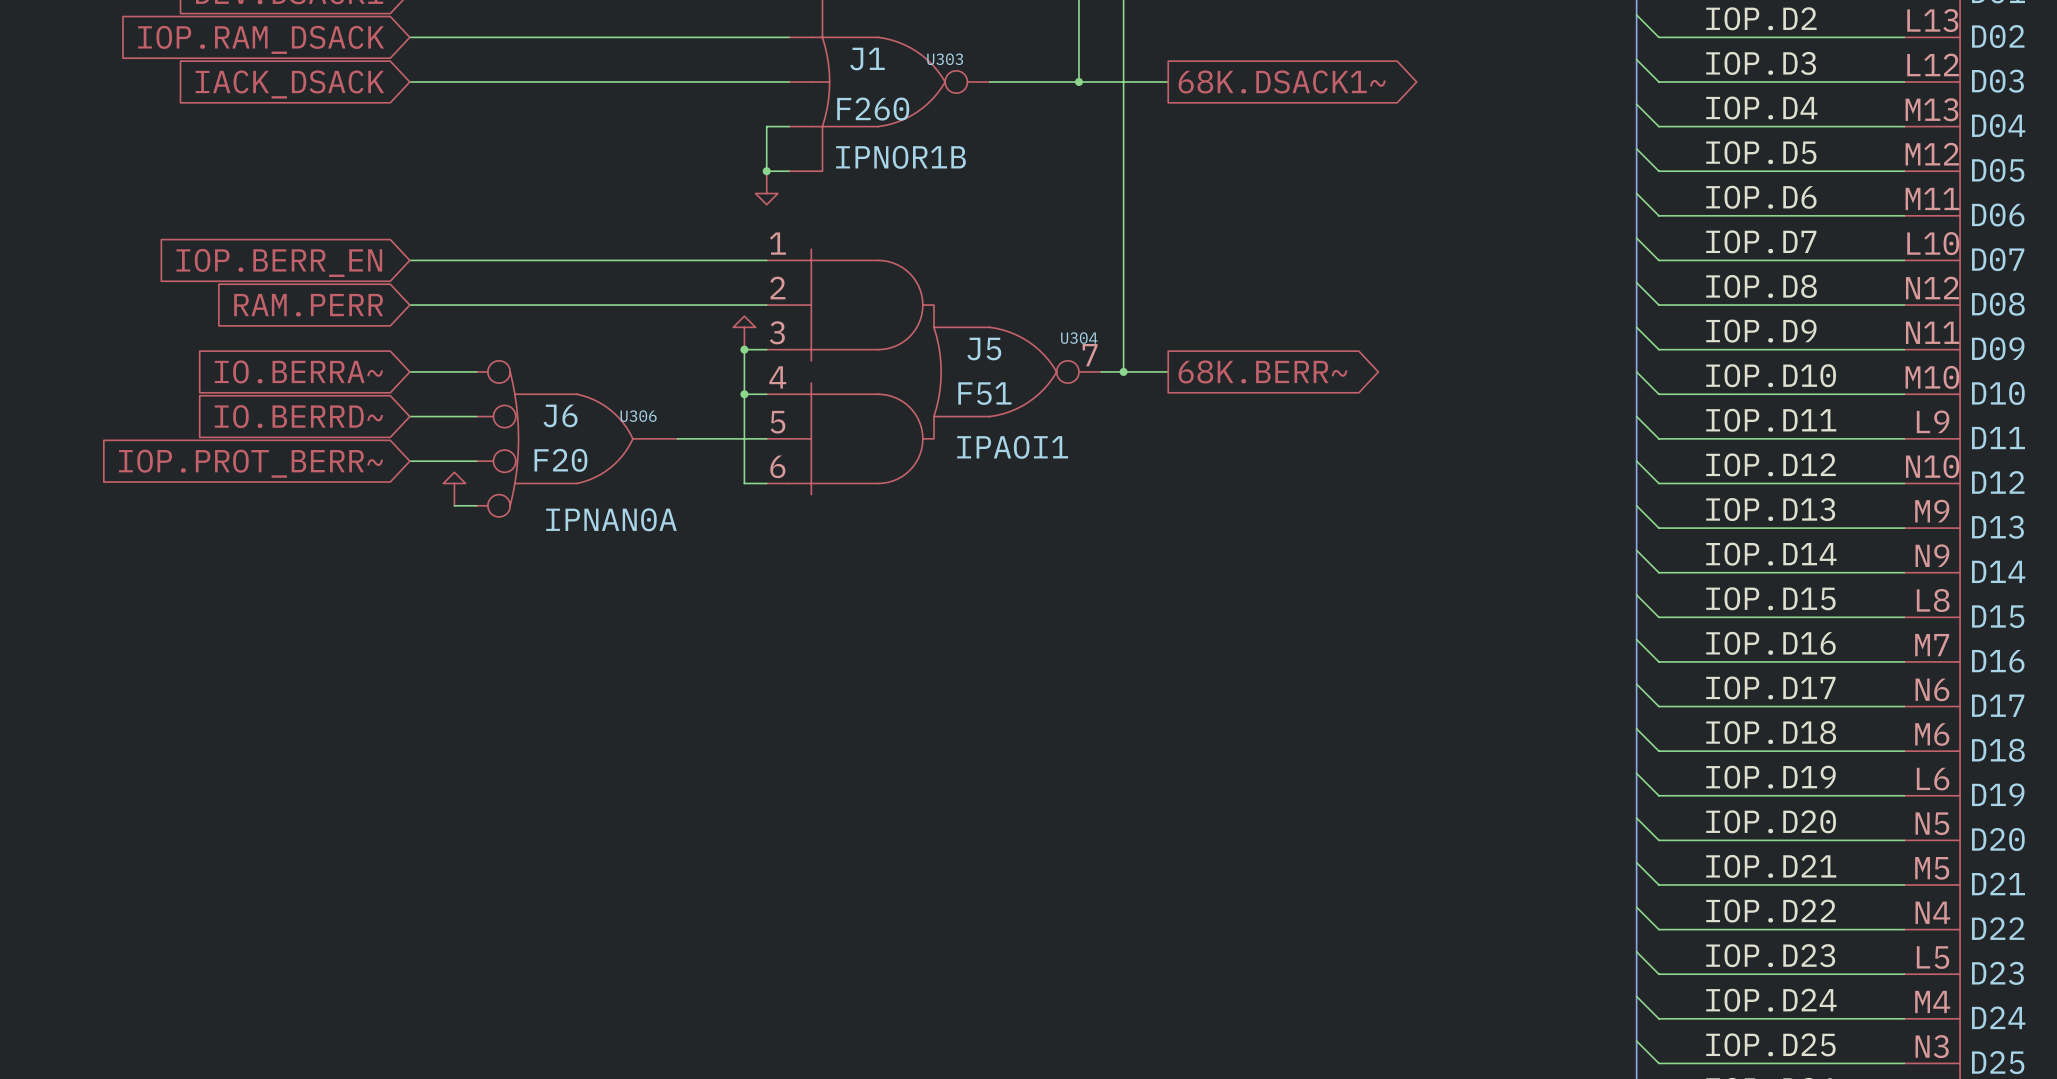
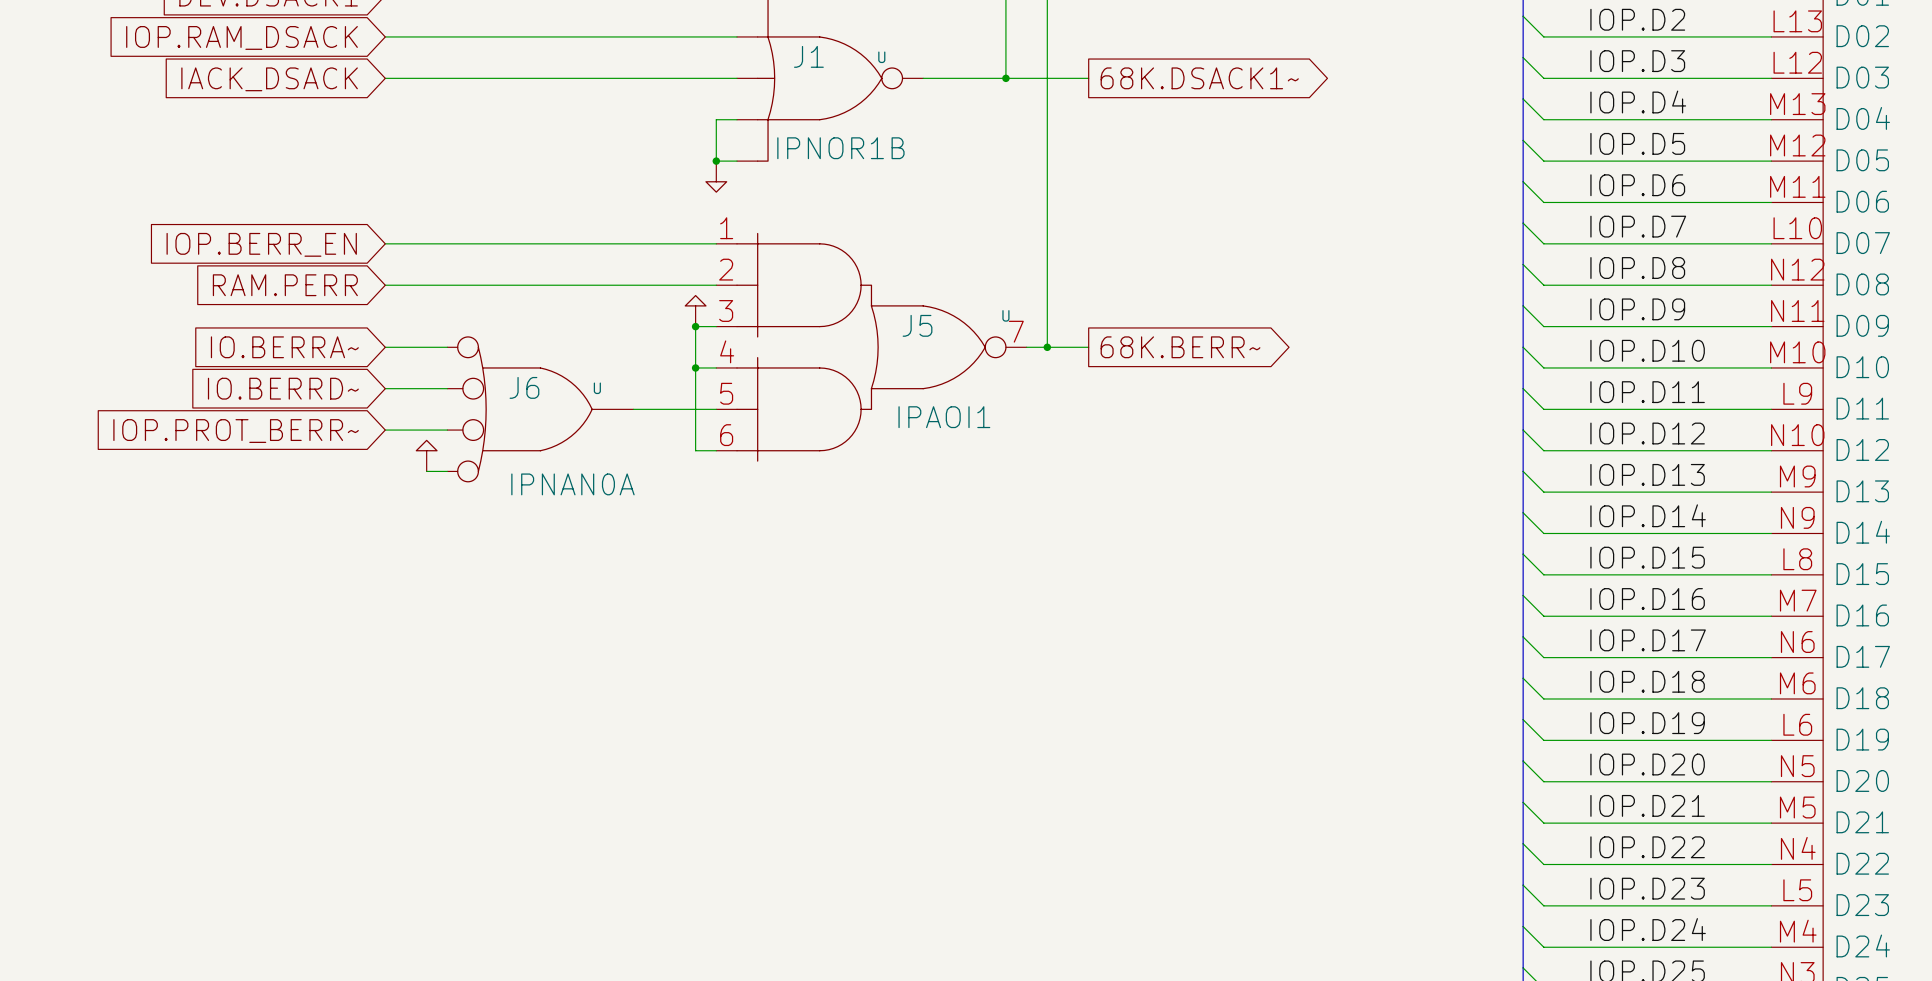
U303 name: U303 (945, 59) -> U (881, 57)
U303 value: F260 (873, 109) -> none
U304 name: U304 (1079, 338) -> U (1005, 315)
U304 value: F51 (984, 393) -> none
U306 name: U306 (638, 416) -> U (597, 388)
U306 value: F20 (560, 460) -> none

